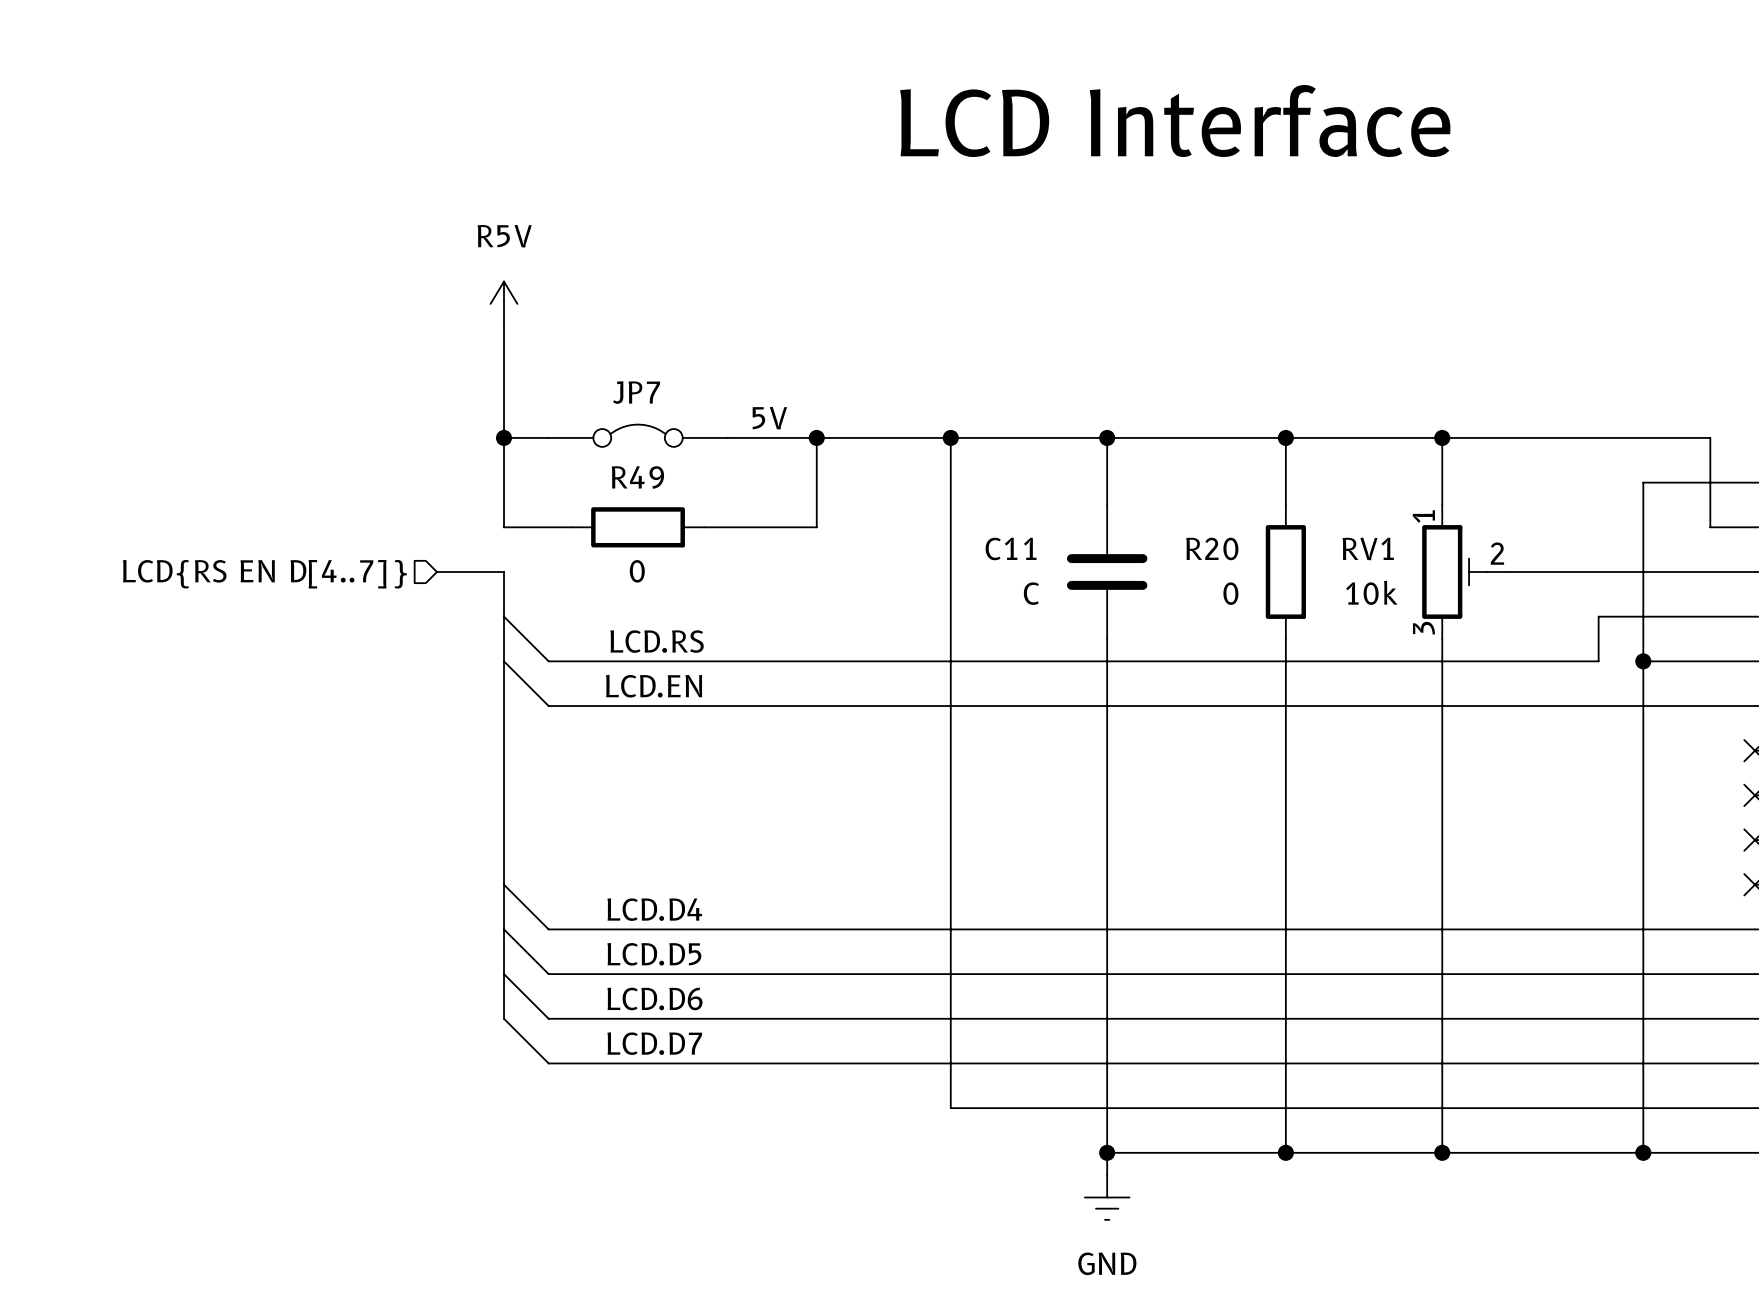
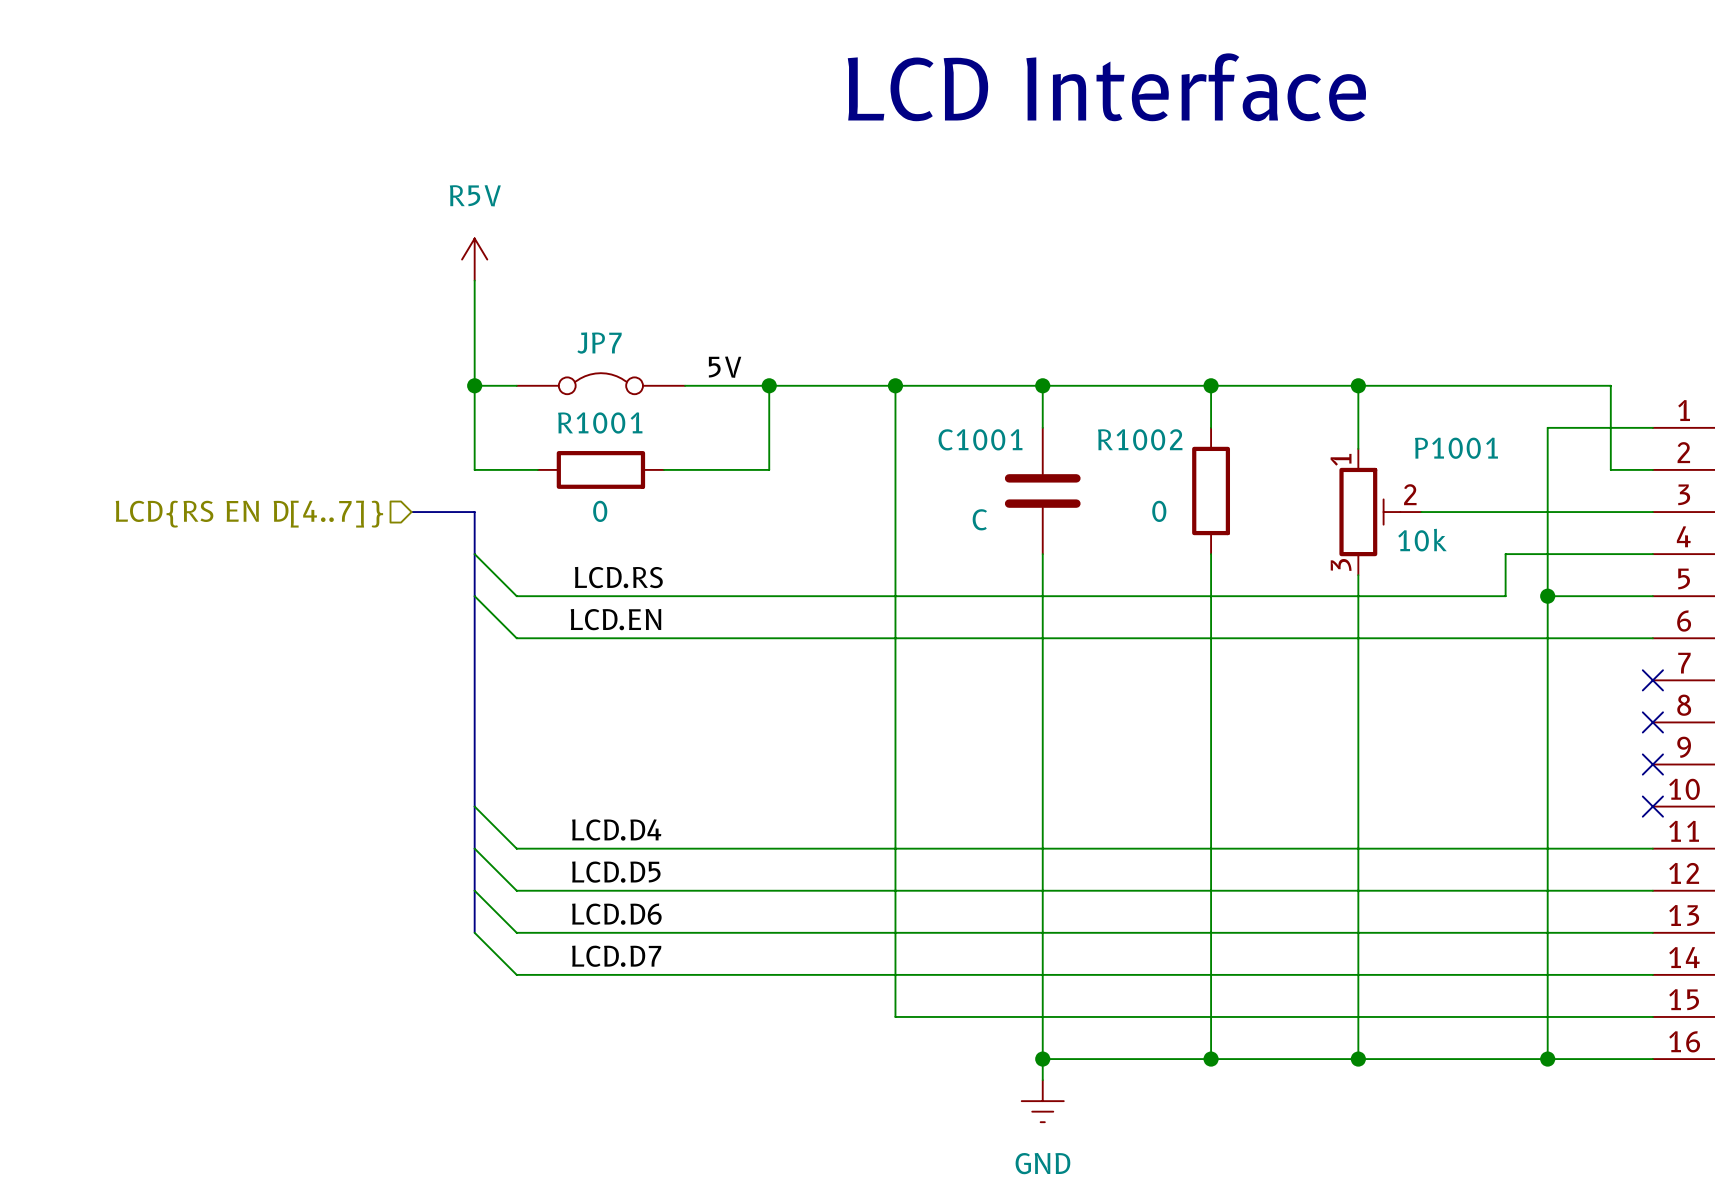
R49 name: R49 (637, 477) -> R1001 (600, 422)
RV1 name: RV1 (1368, 548) -> P1001 (1456, 448)
C1001: none -> C (1042, 490)
R1002: none -> 0 (1211, 490)
C11: C (1107, 571) -> none
R20: 0 (1285, 571) -> none
RV1 value position: 10k (1371, 592) -> 10k (1422, 540)

